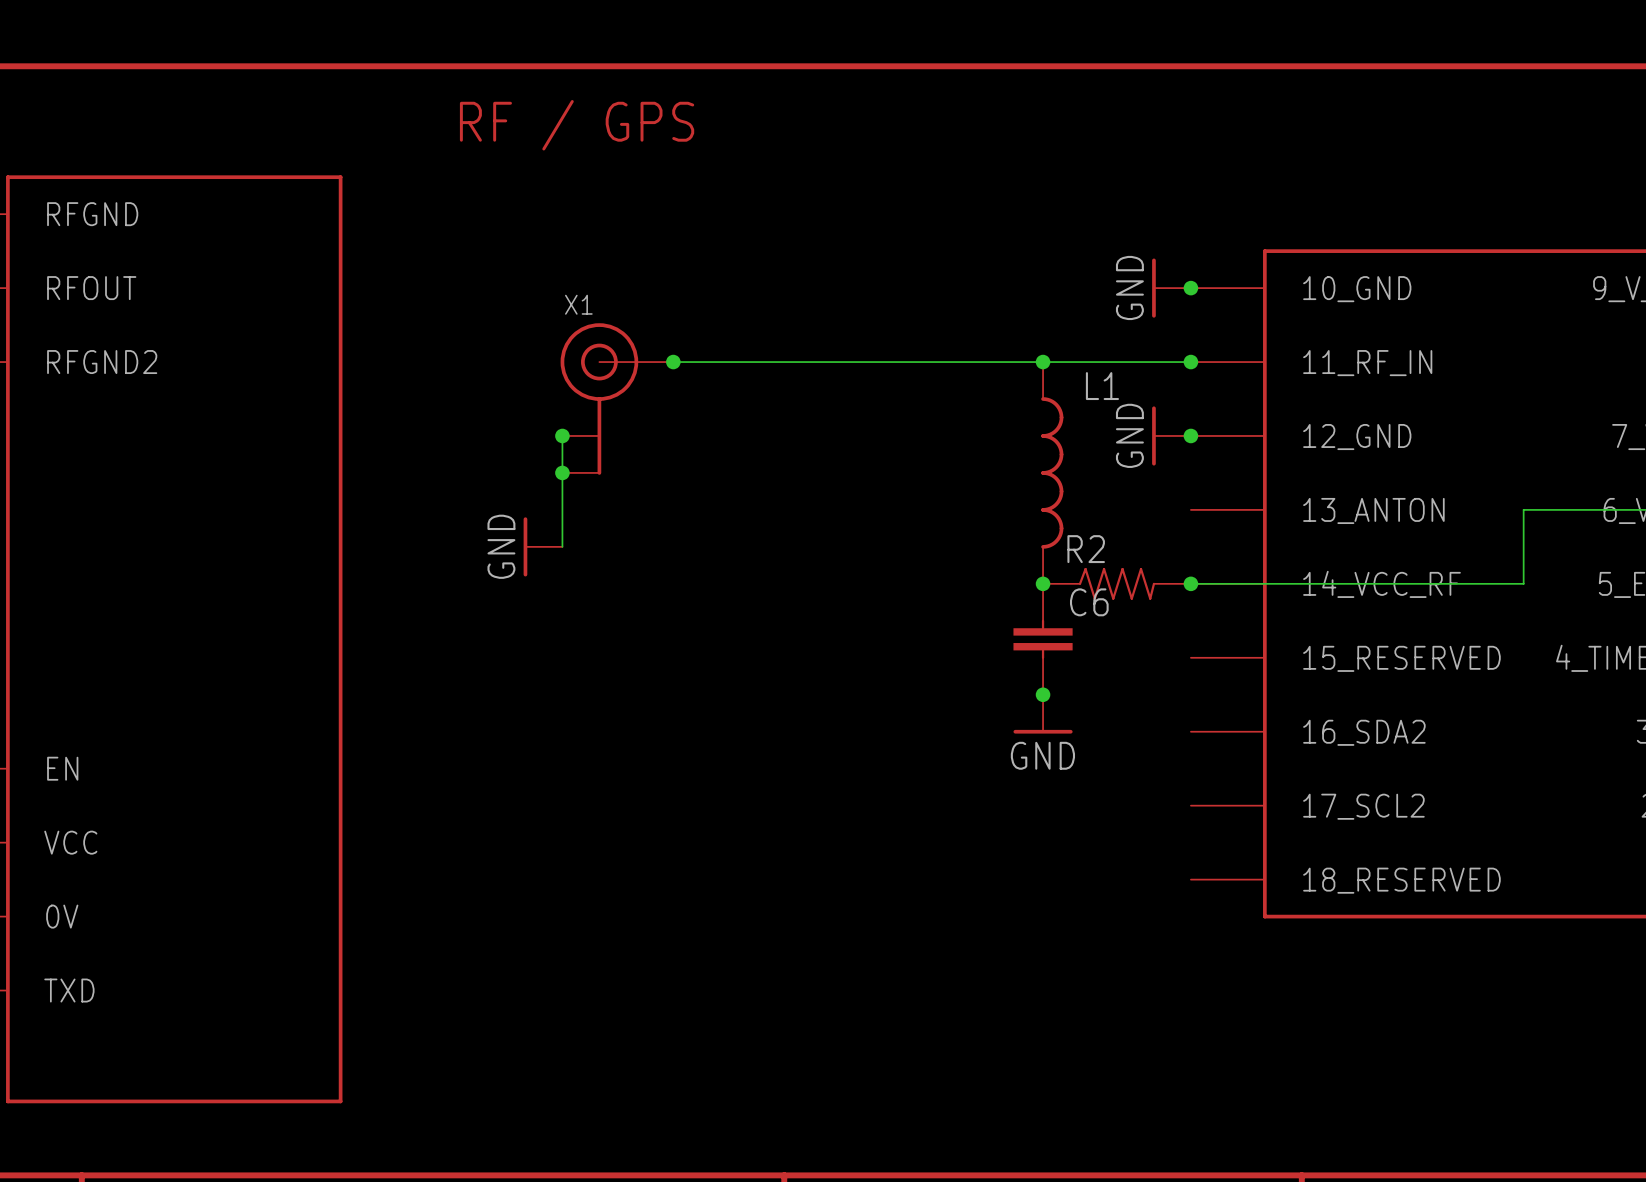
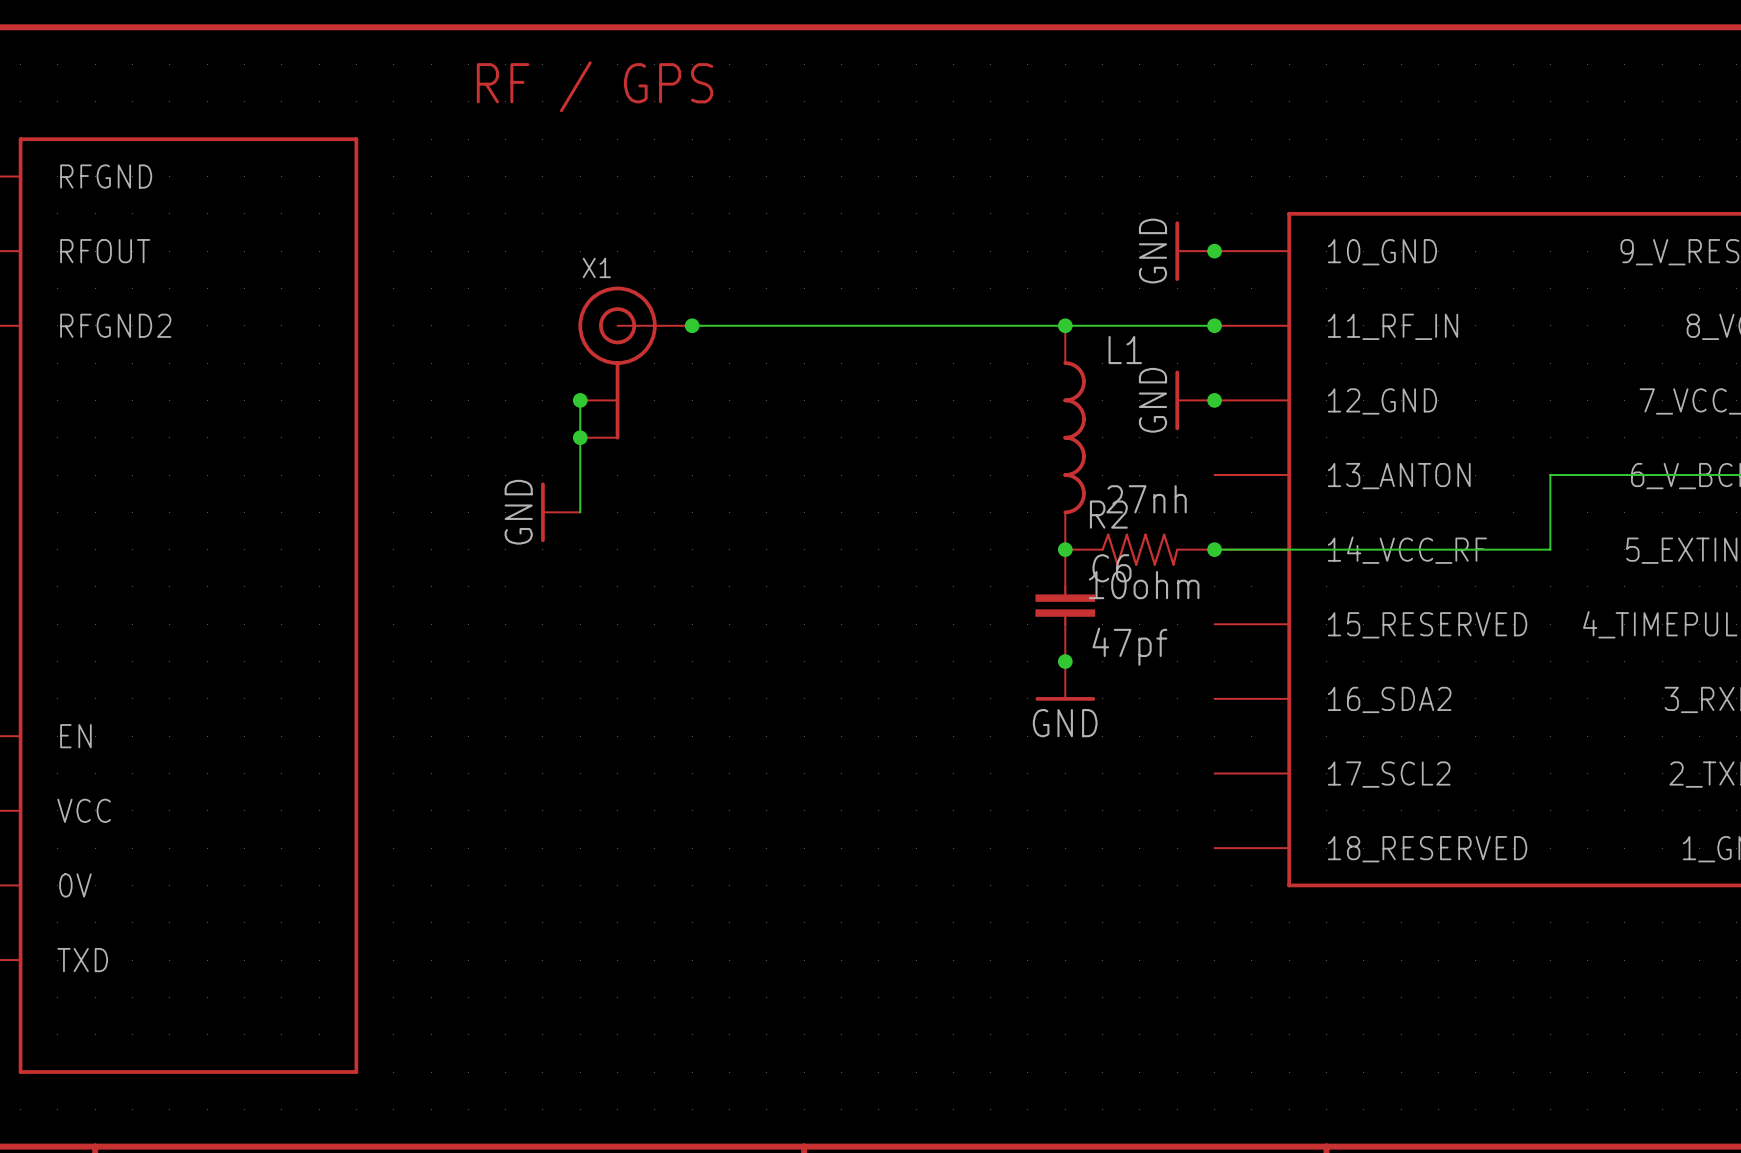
L1 value: none -> 27nh (1146, 499)
R2 value: none -> 10ohm (1144, 585)
C6 value: none -> 47pf (1129, 646)

